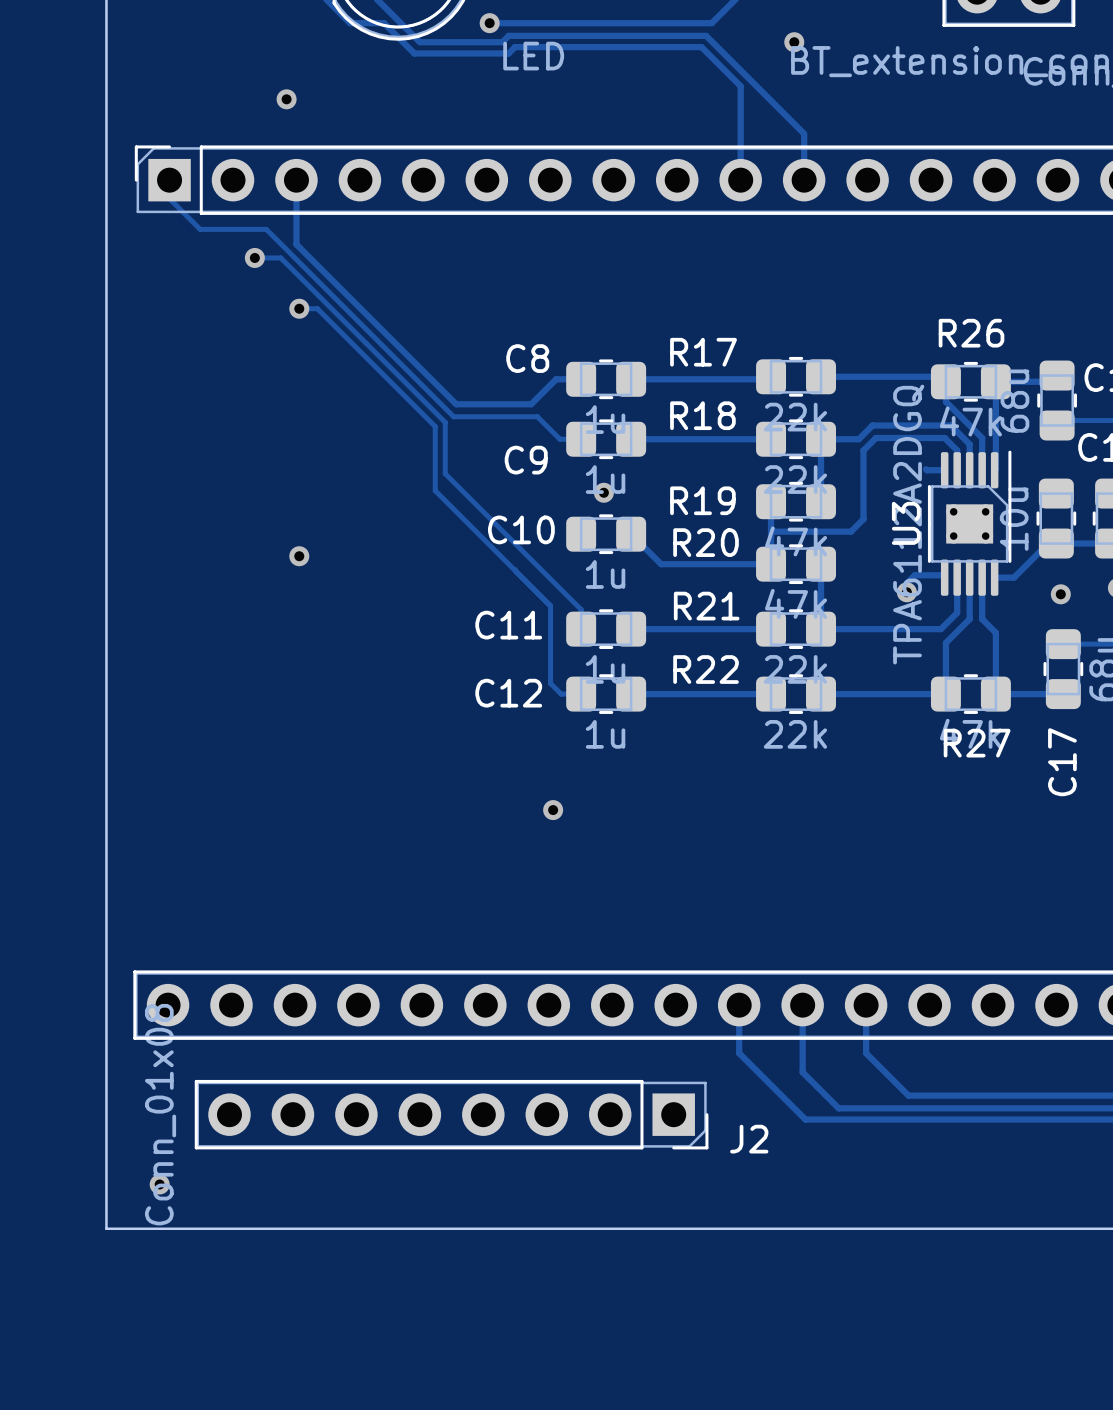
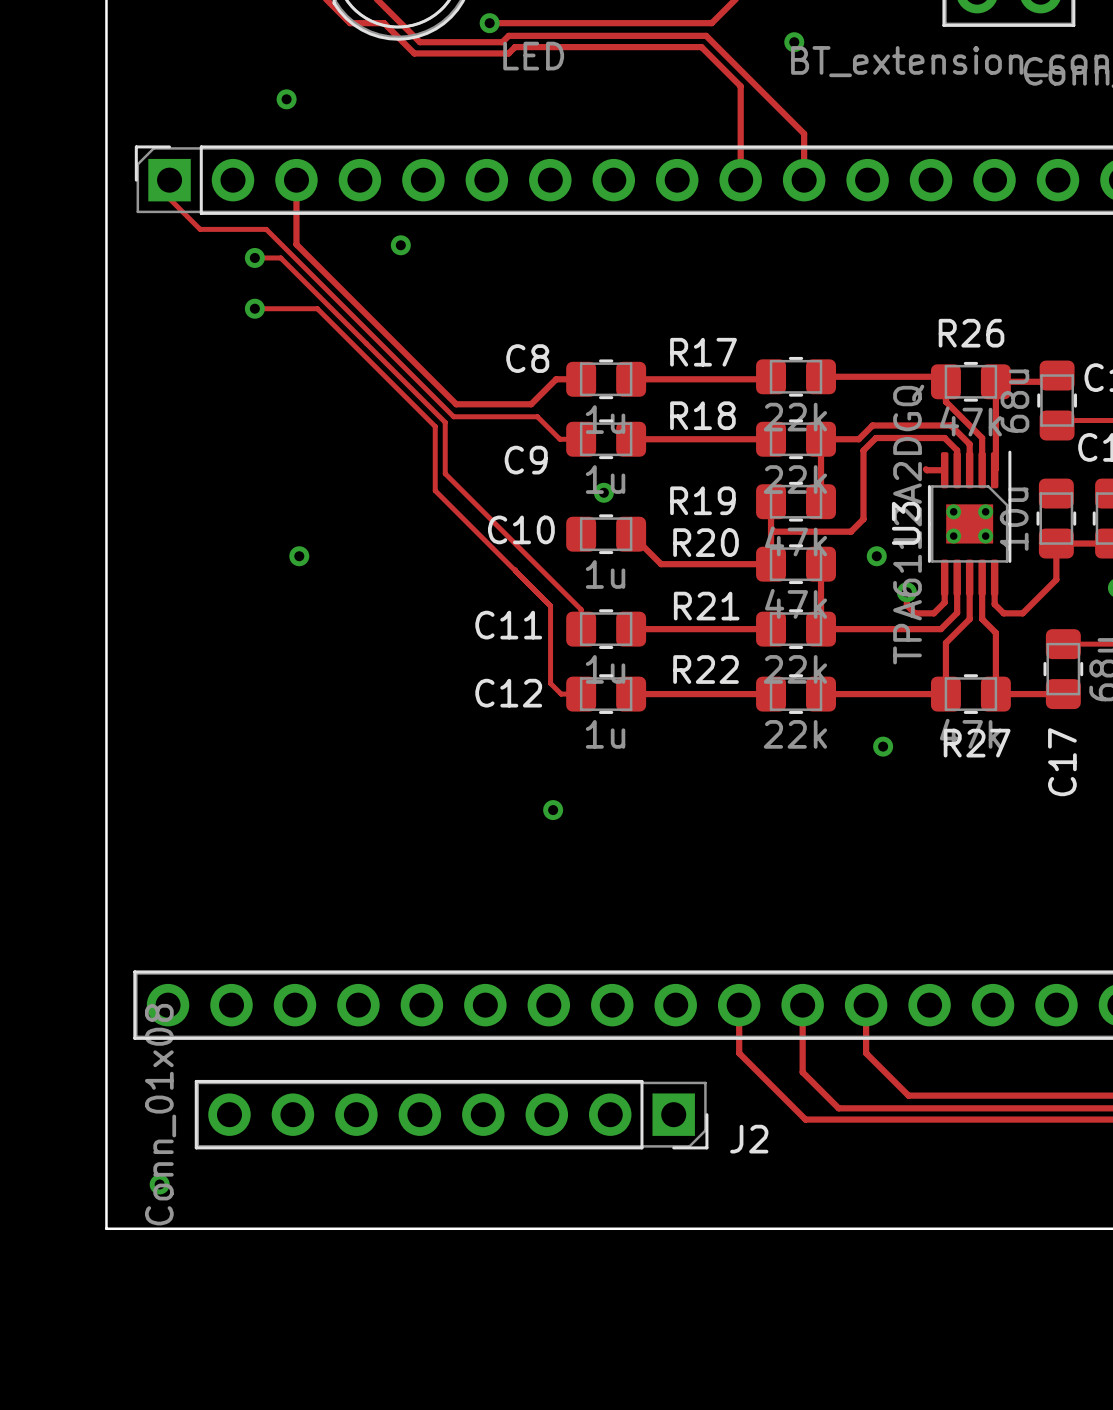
via: none -> (400, 245)
track: none -> (254, 308) (299, 308)
via position: (299, 308) -> (254, 308)
track: (1048, 543) (1013, 577) (994, 577) -> (1056, 543) (1056, 579) (1022, 613) (1003, 613) (994, 604) (994, 577)
via: none -> (876, 556)
track: (944, 577) (942, 575) (914, 575) (906, 583) (906, 592) -> (944, 577) (944, 602) (933, 613) (914, 613) (906, 605) (906, 592)
via: (1060, 594) -> none
via: none -> (883, 746)

